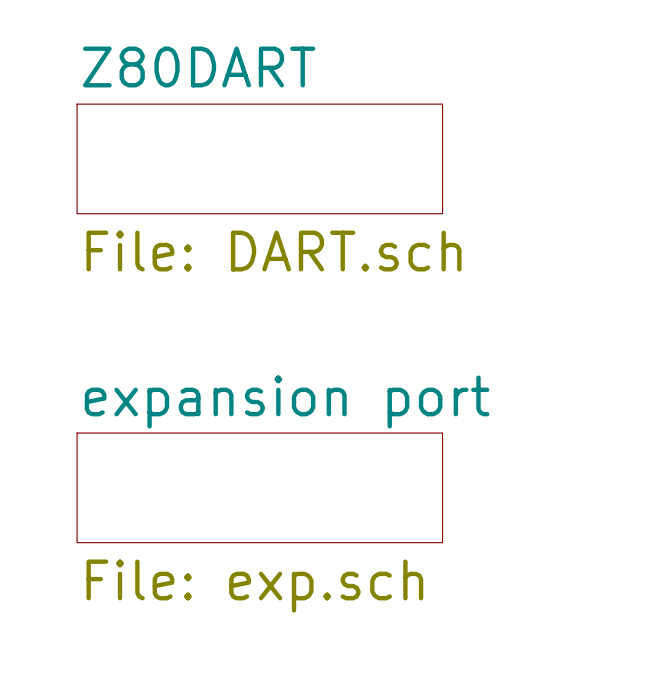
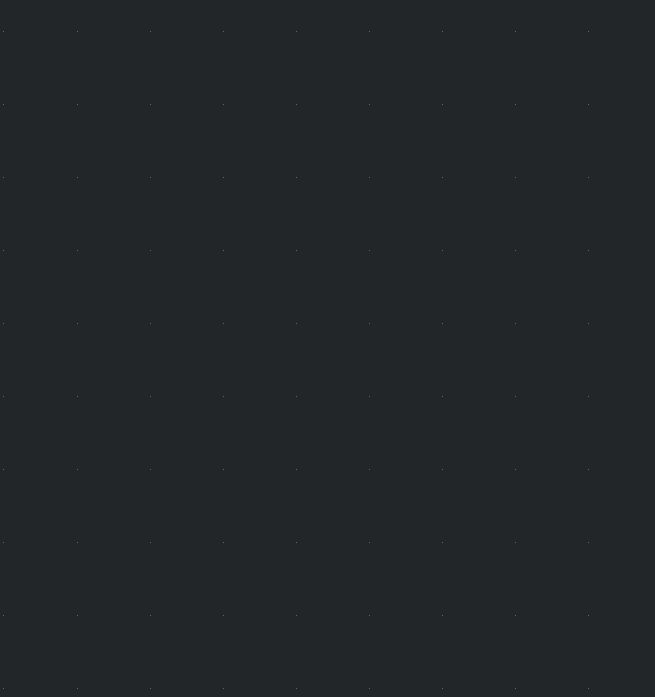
sheet Z80DART: File: DART.sch (259, 158) -> none
sheet expansion port: File: exp.sch (259, 487) -> none

